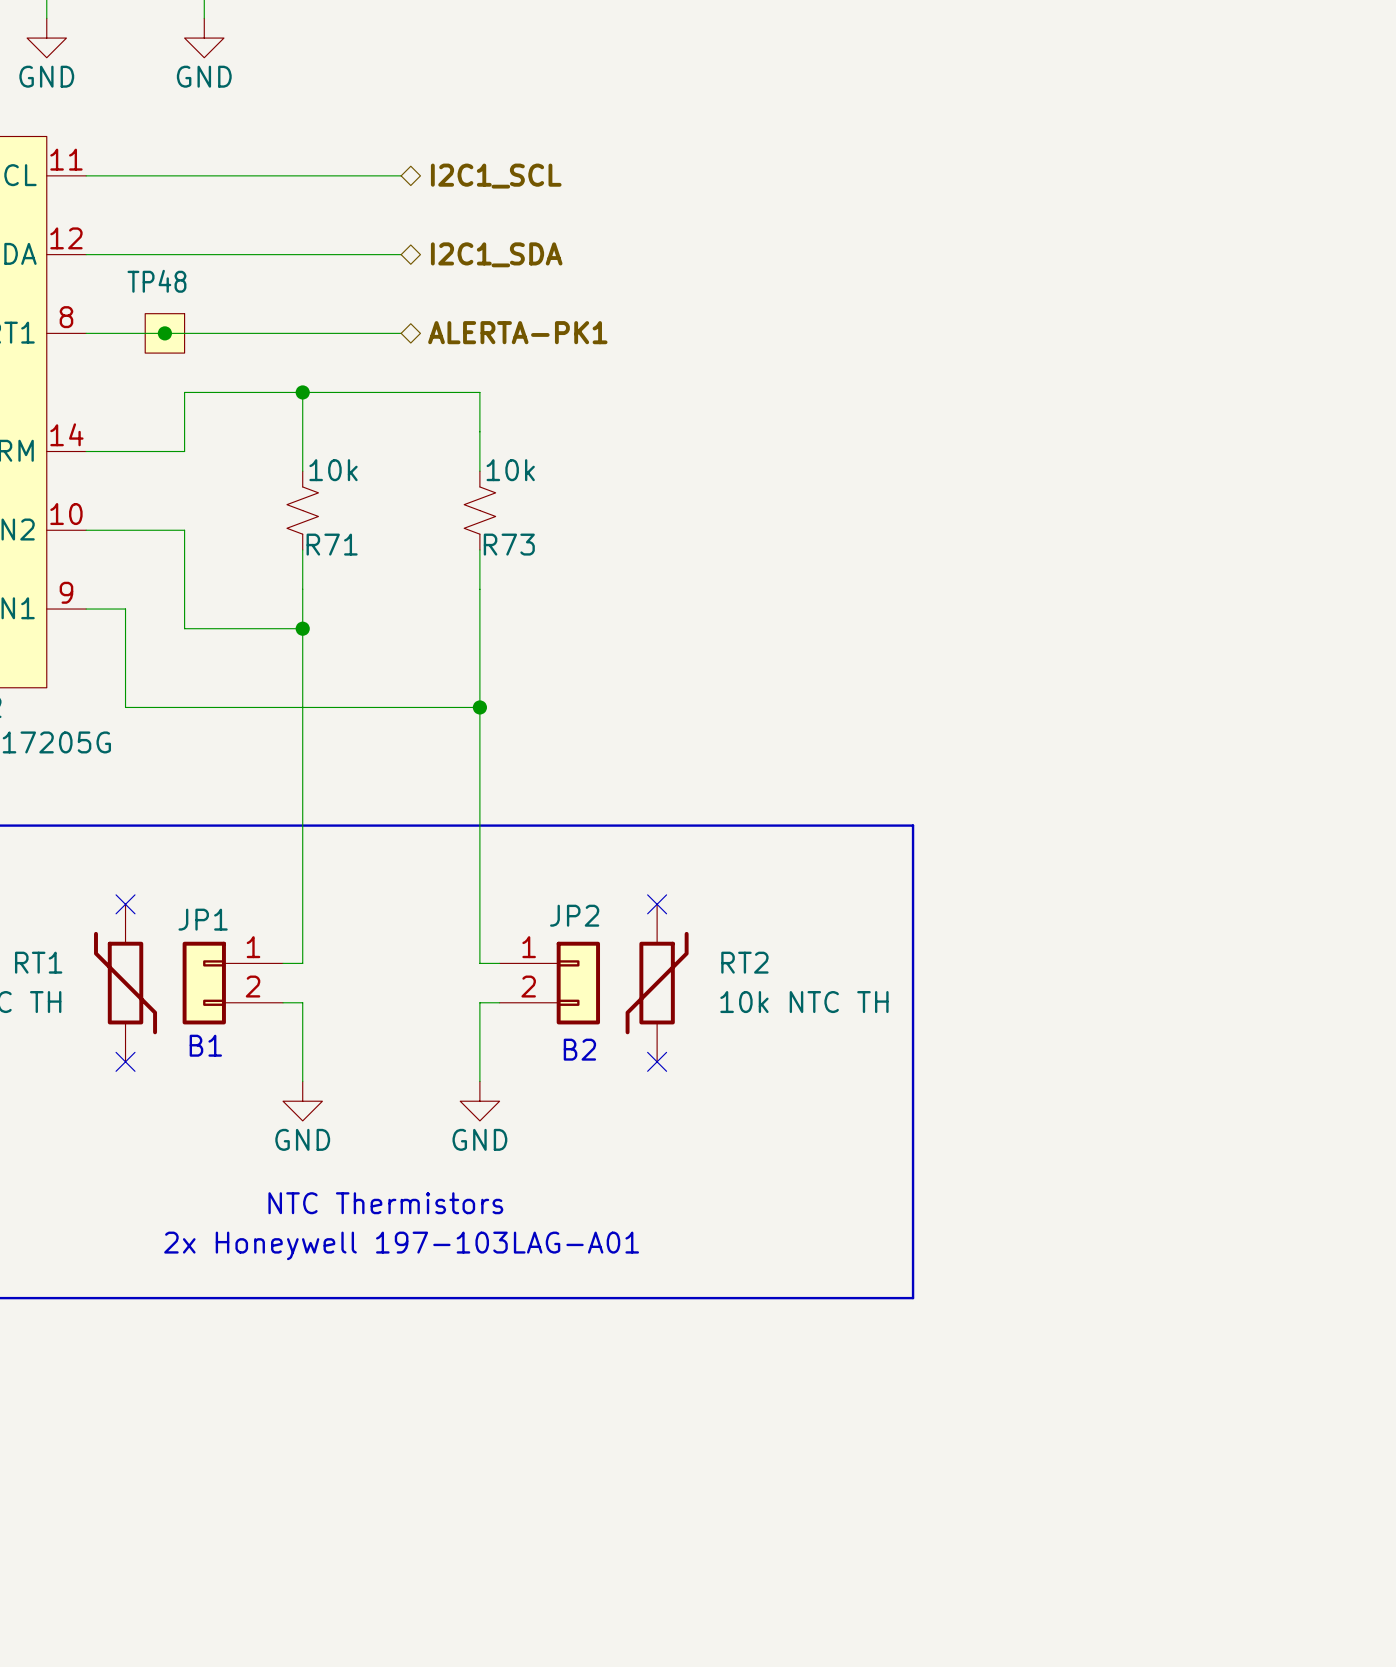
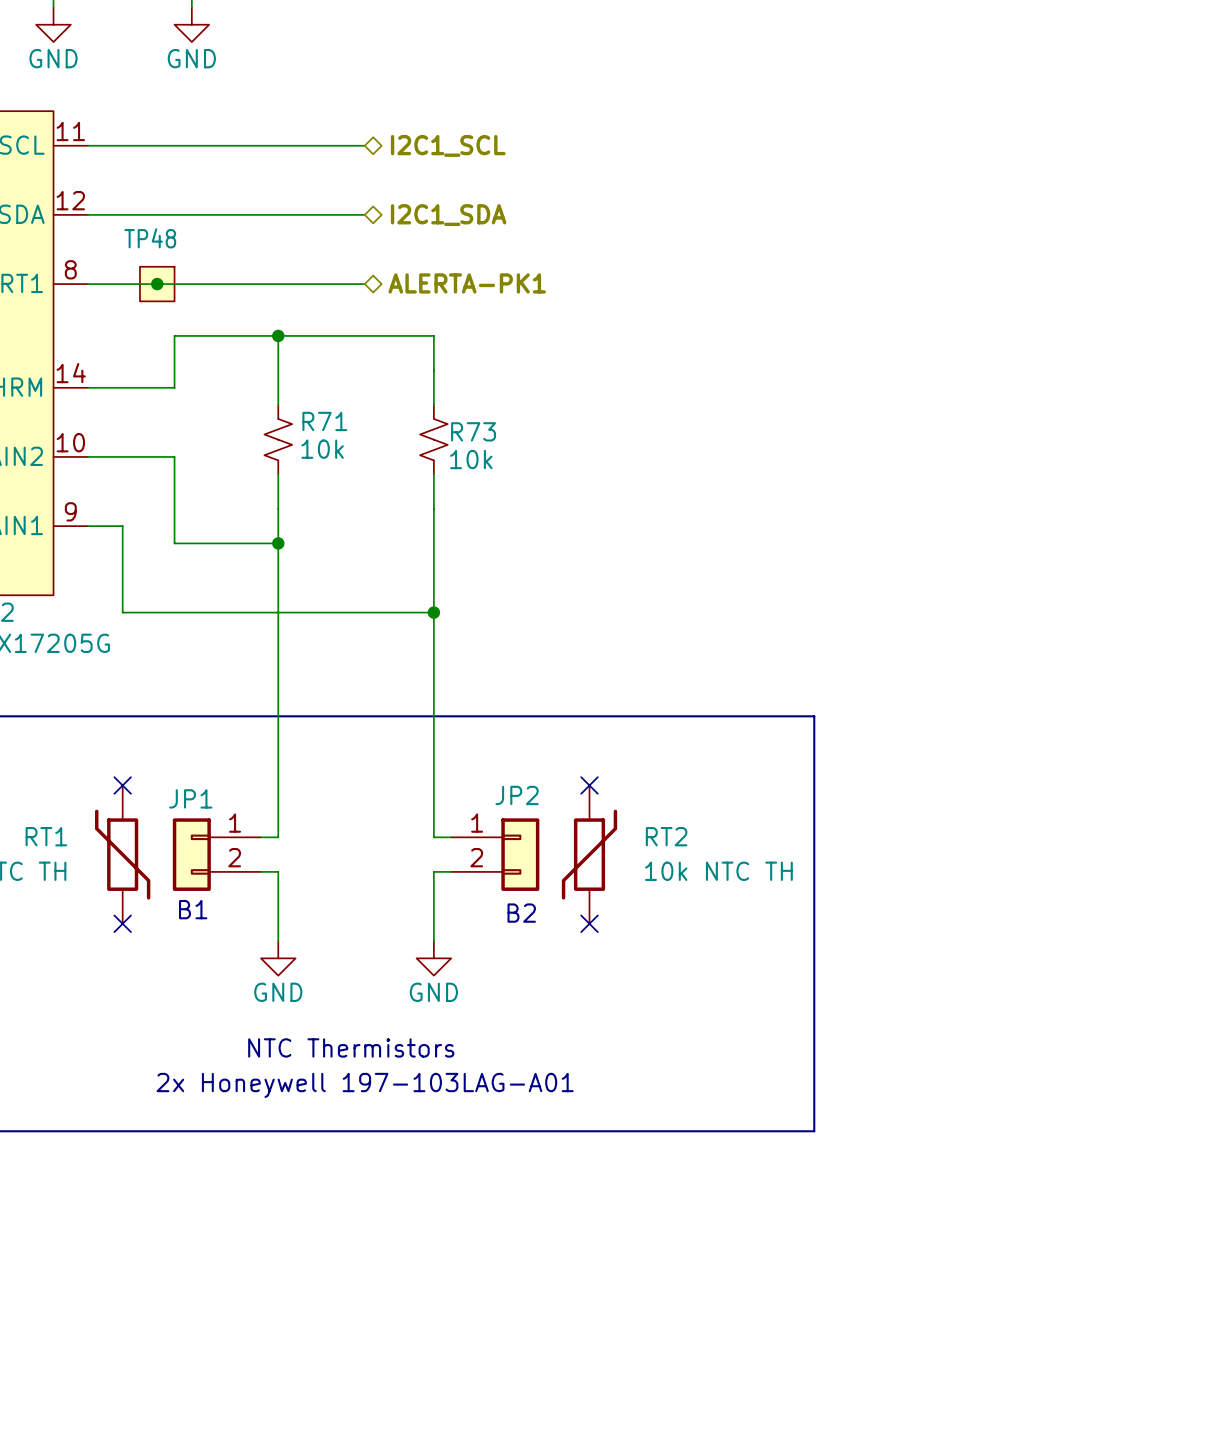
R71 value position: 10k (333, 470) -> 10k (322, 449)
R73 value position: 10k (510, 470) -> 10k (471, 459)
R71 name position: R71 (332, 544) -> R71 (324, 421)
R73 name position: R73 (509, 544) -> R73 (473, 431)

